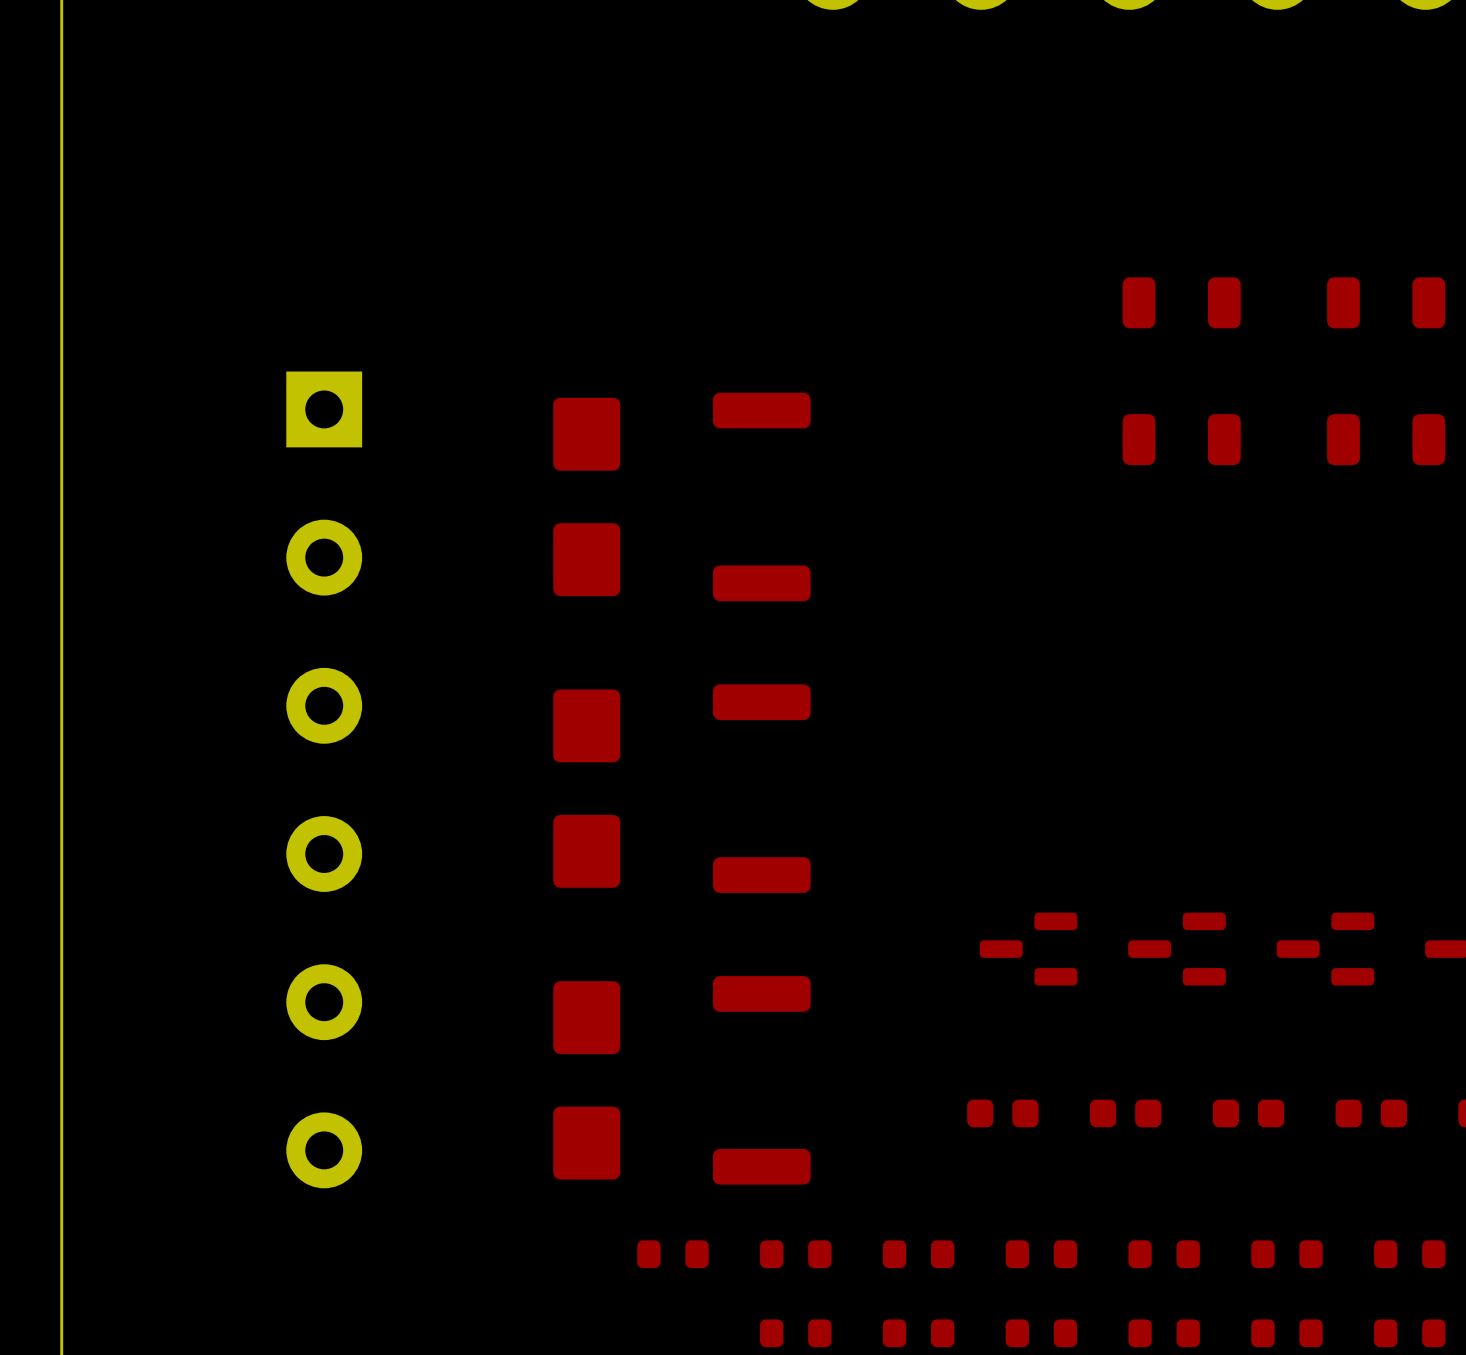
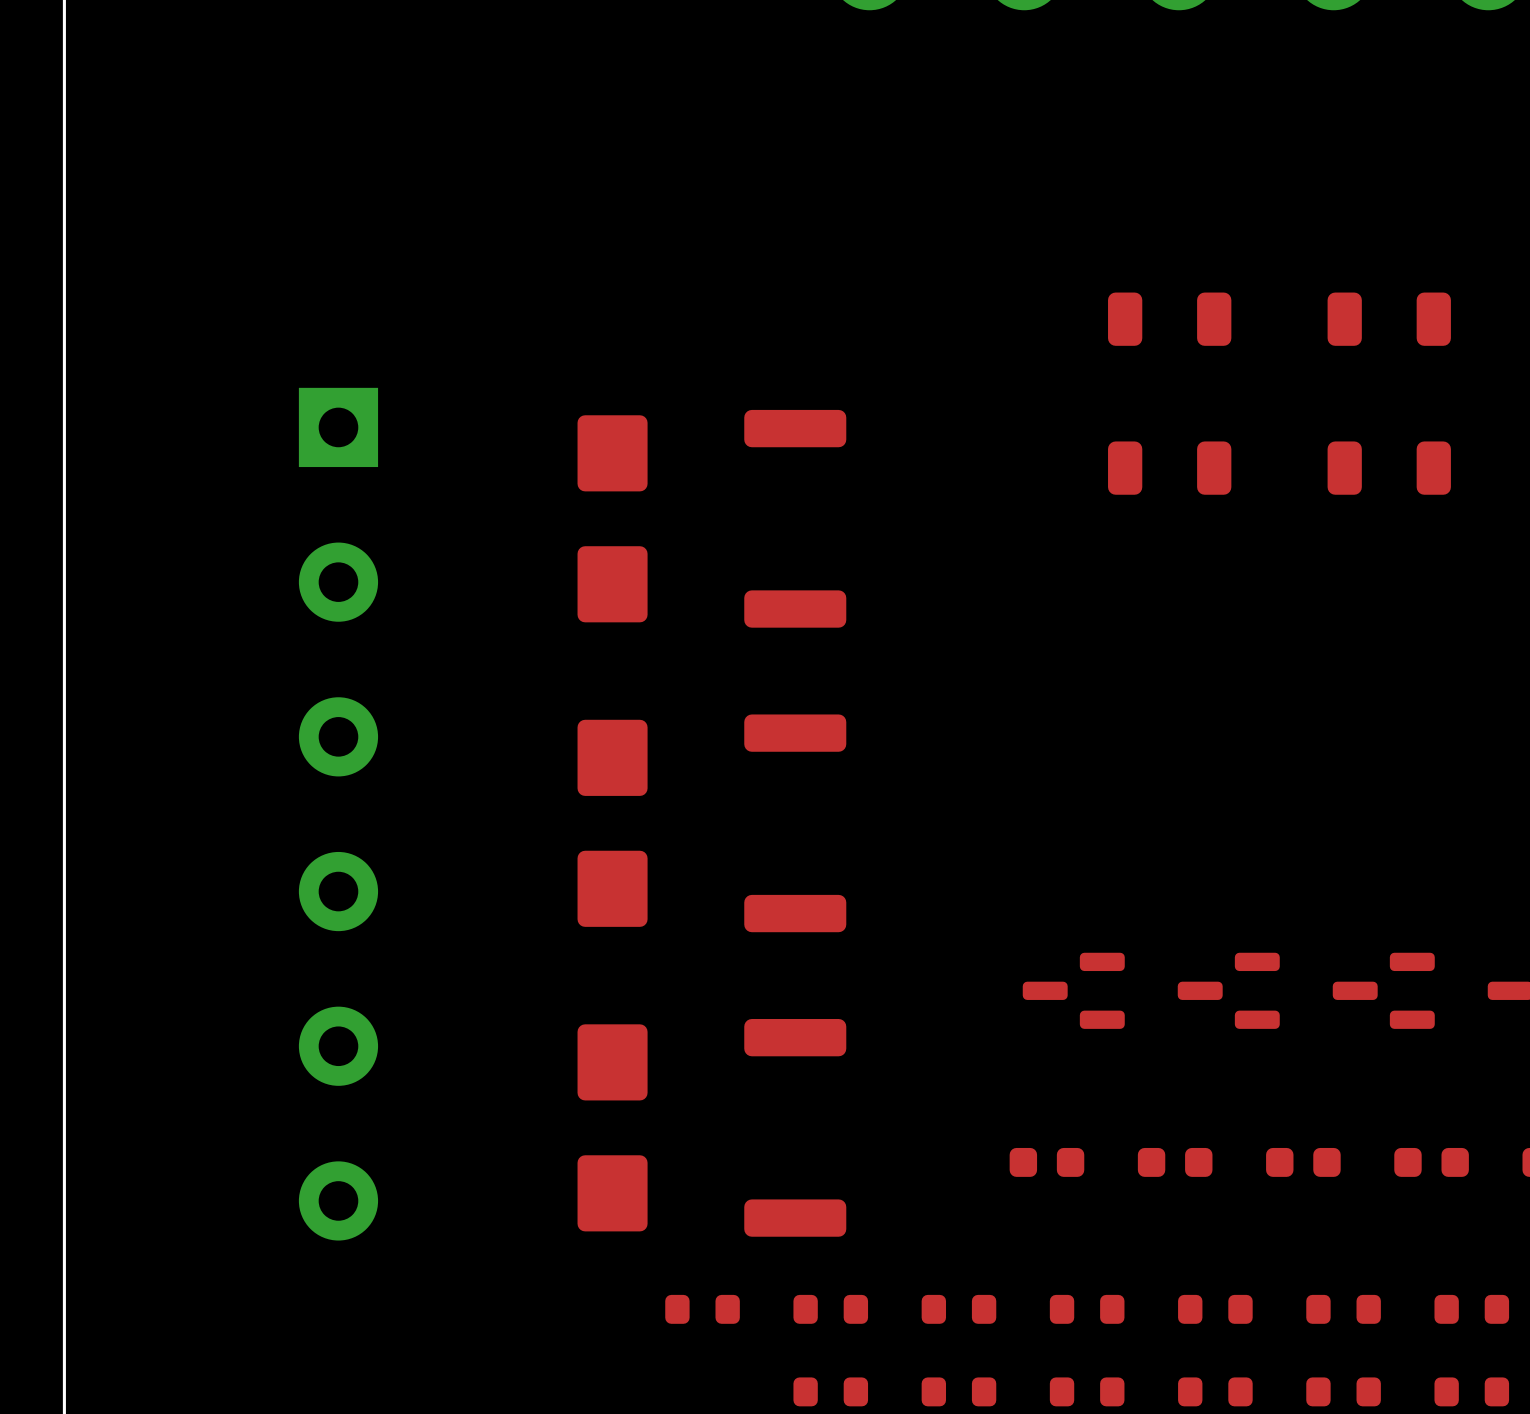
part position: (1181, 302) -> (1169, 319)
part position: (1386, 302) -> (1389, 319)
part position: (1181, 439) -> (1169, 468)
part position: (1386, 439) -> (1389, 468)

